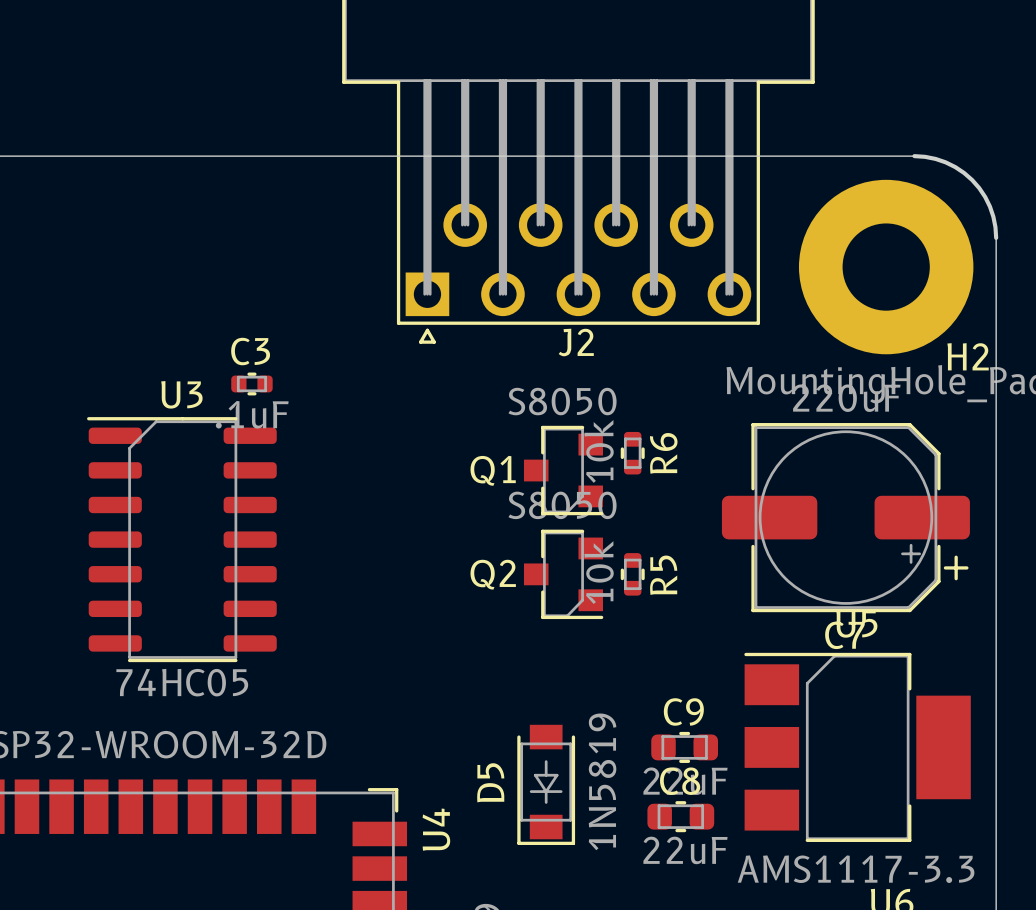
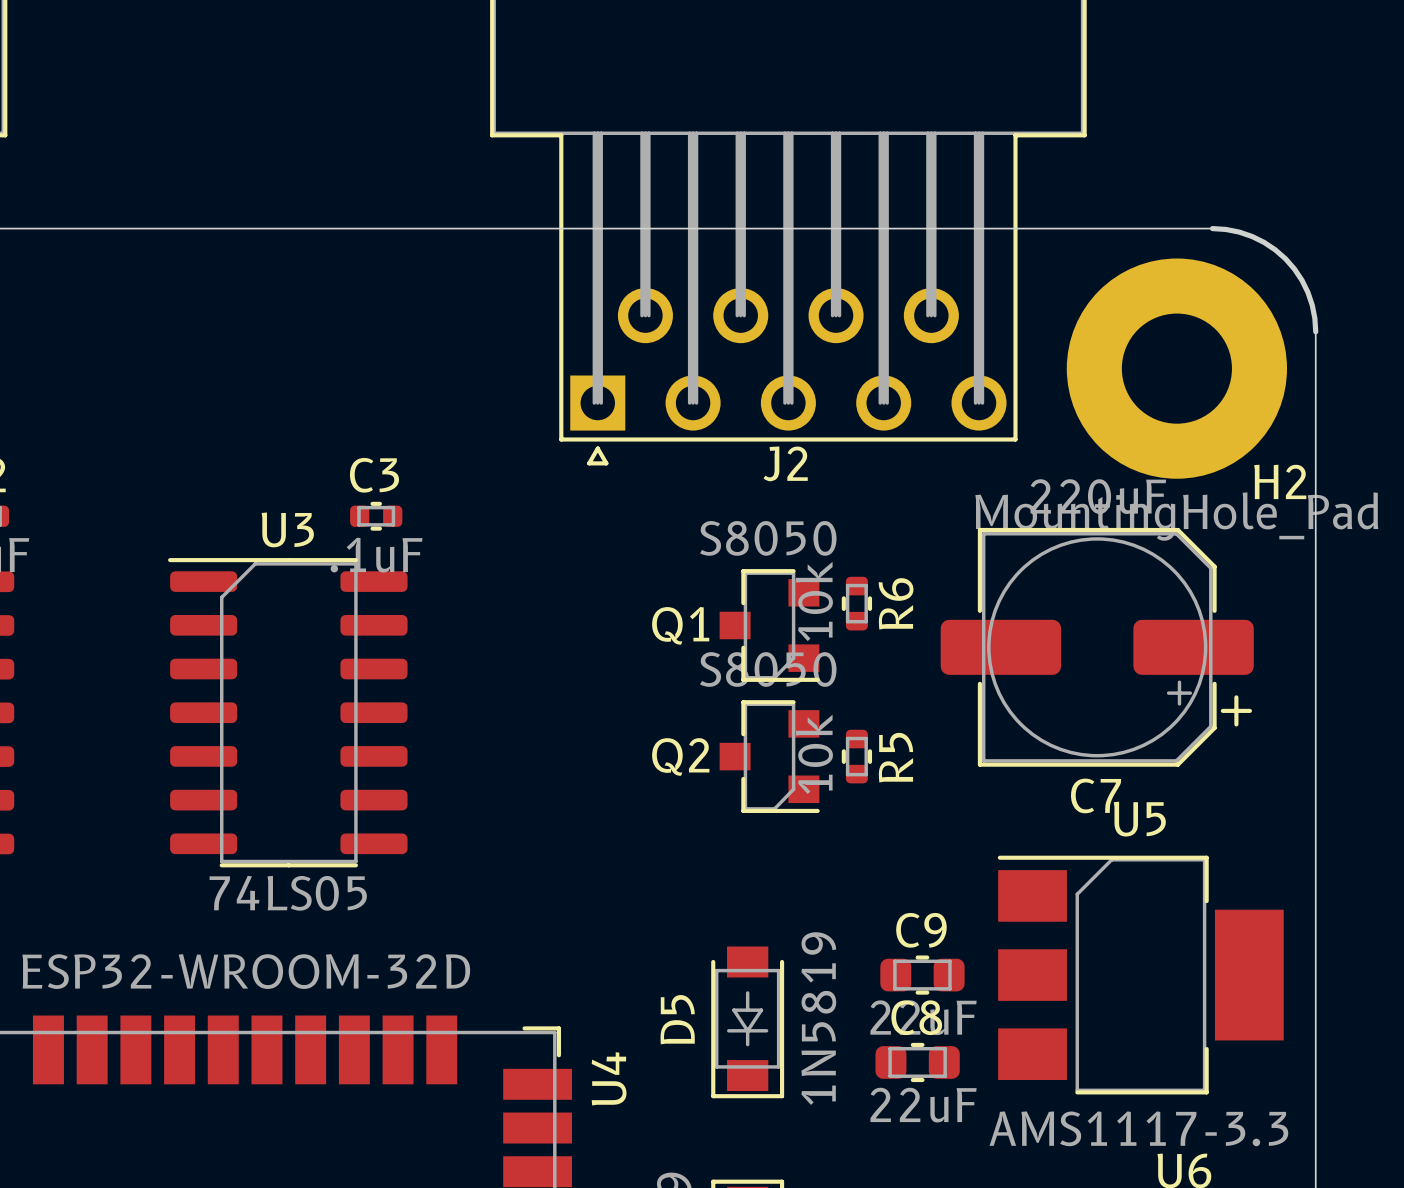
C7 position: (845, 517) -> (1097, 647)
U3 value: 74HC05 (182, 682) -> 74LS05 (288, 893)

